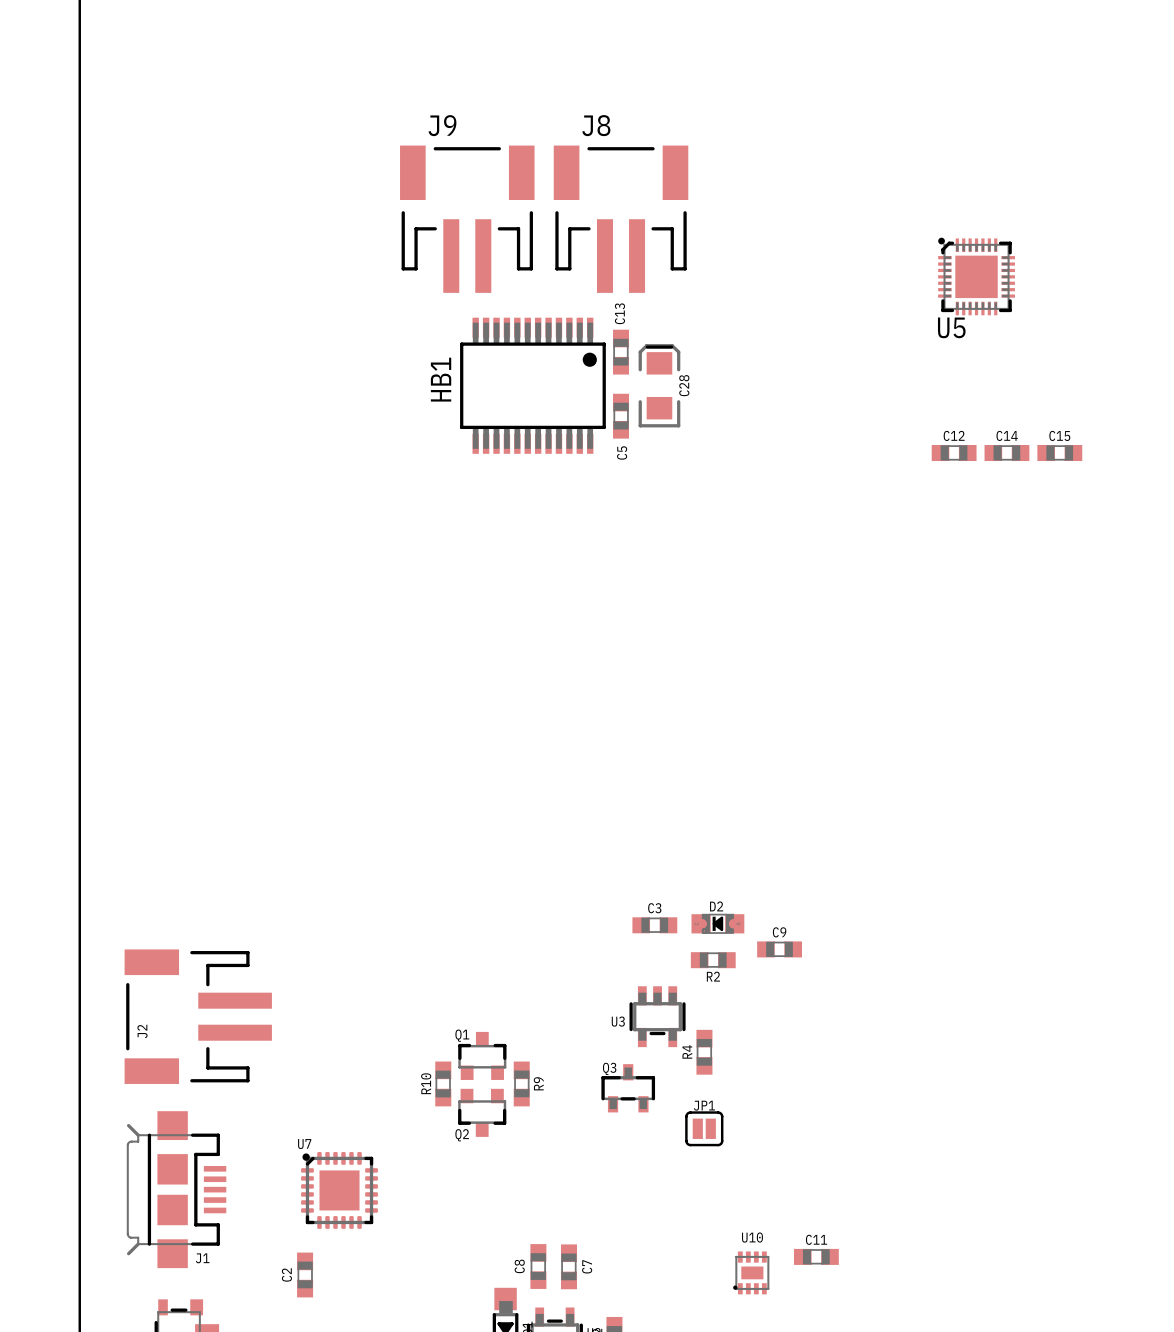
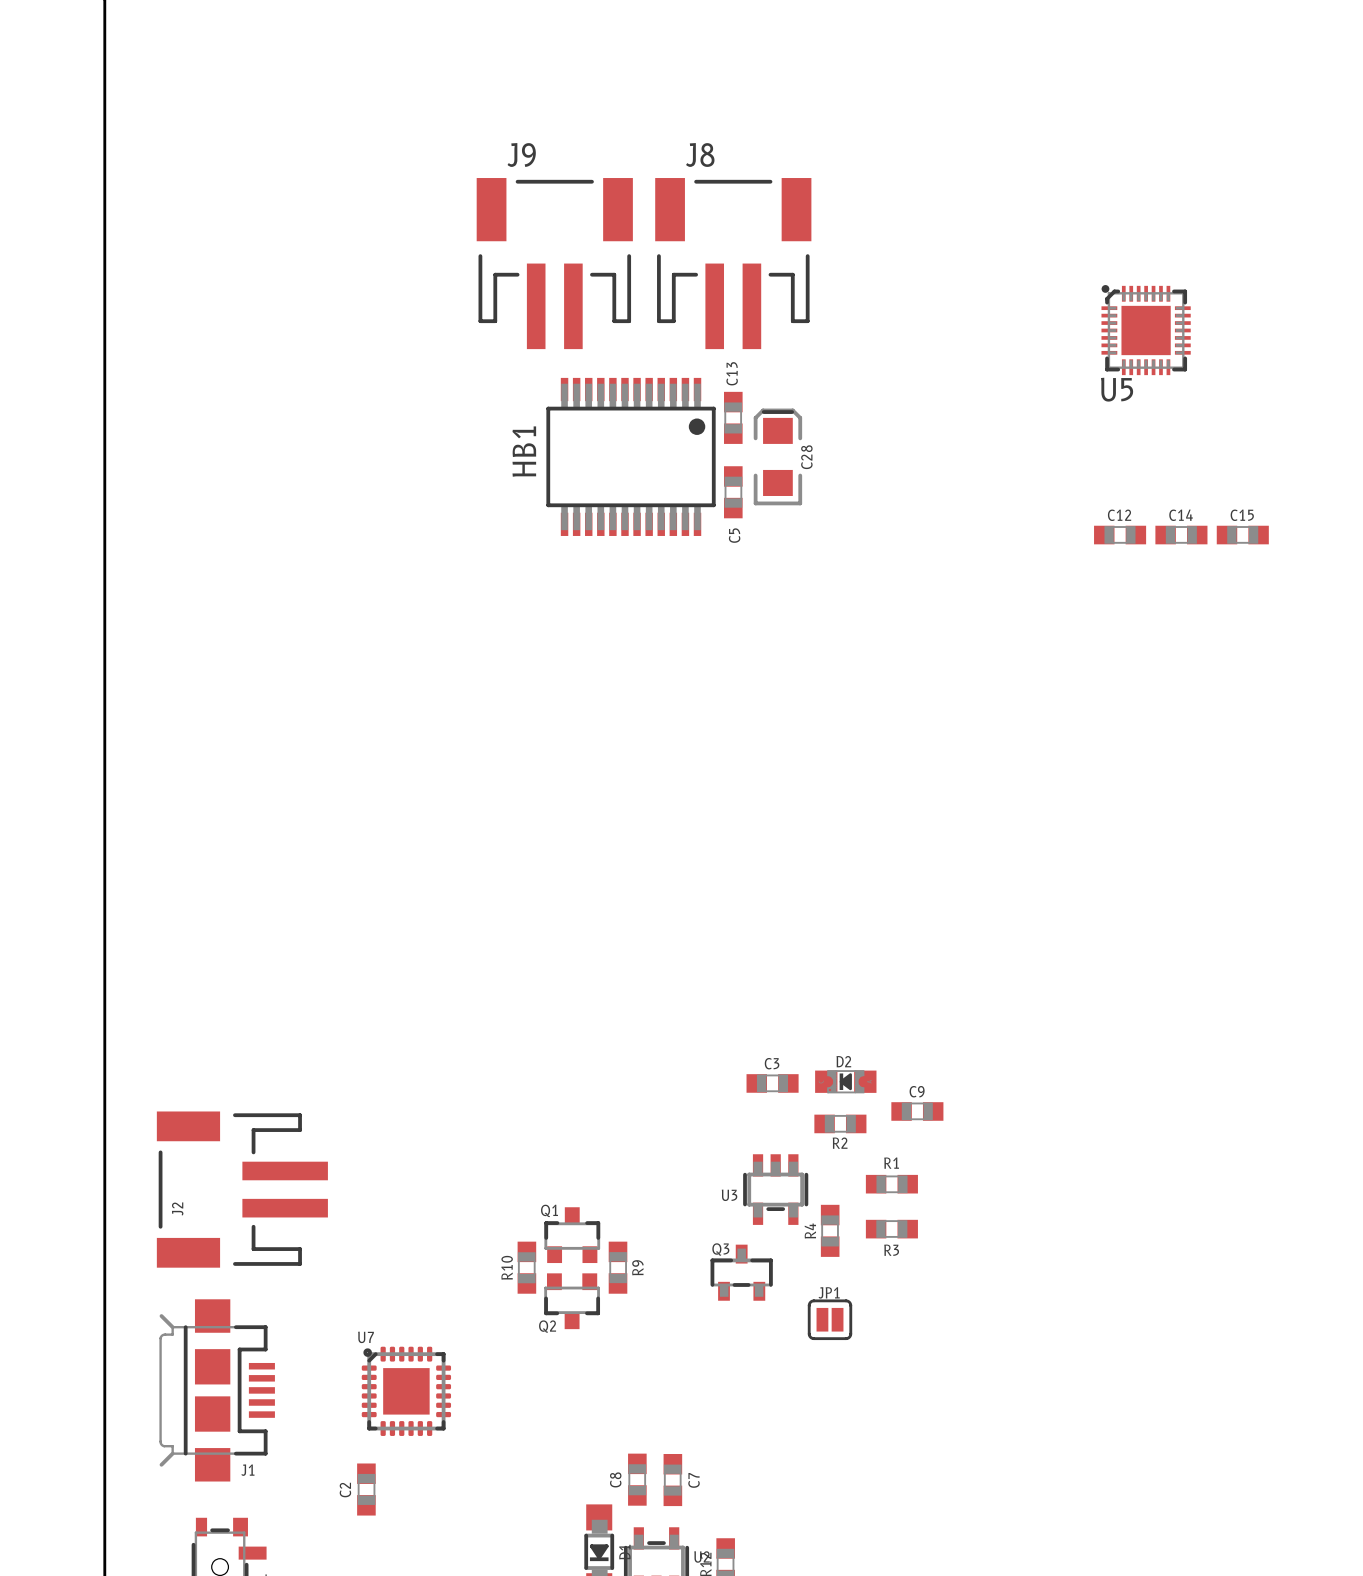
R1: none -> (891, 1184)
R3: none -> (891, 1229)
C11: (816, 1256) -> none
U10: (751, 1272) -> none

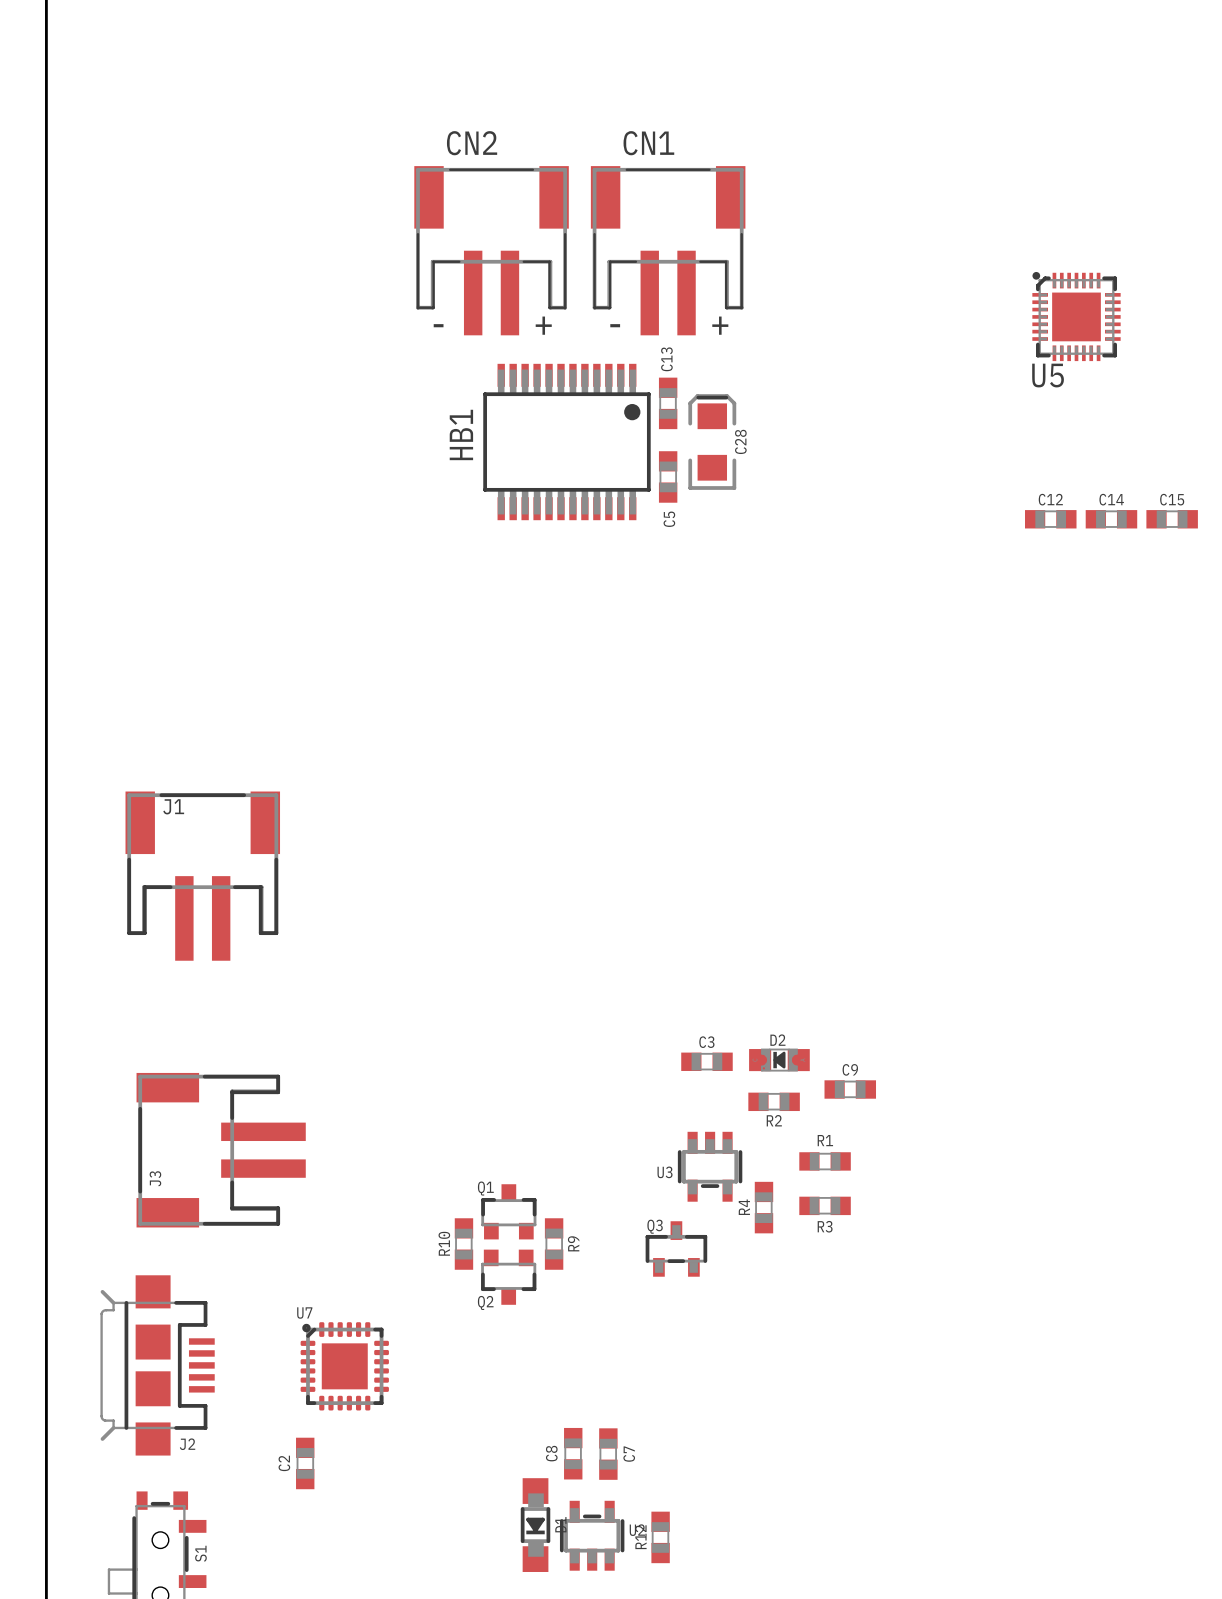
J9: (554, 263) -> none
CN2: none -> (491, 250)
J8: (733, 263) -> none
CN1: none -> (668, 250)
J1: none -> (202, 876)
J3: none -> (221, 1150)
J2: (242, 1189) -> none
JP1: (829, 1319) -> none
J1 name: J1 (247, 1470) -> J2 (187, 1444)

